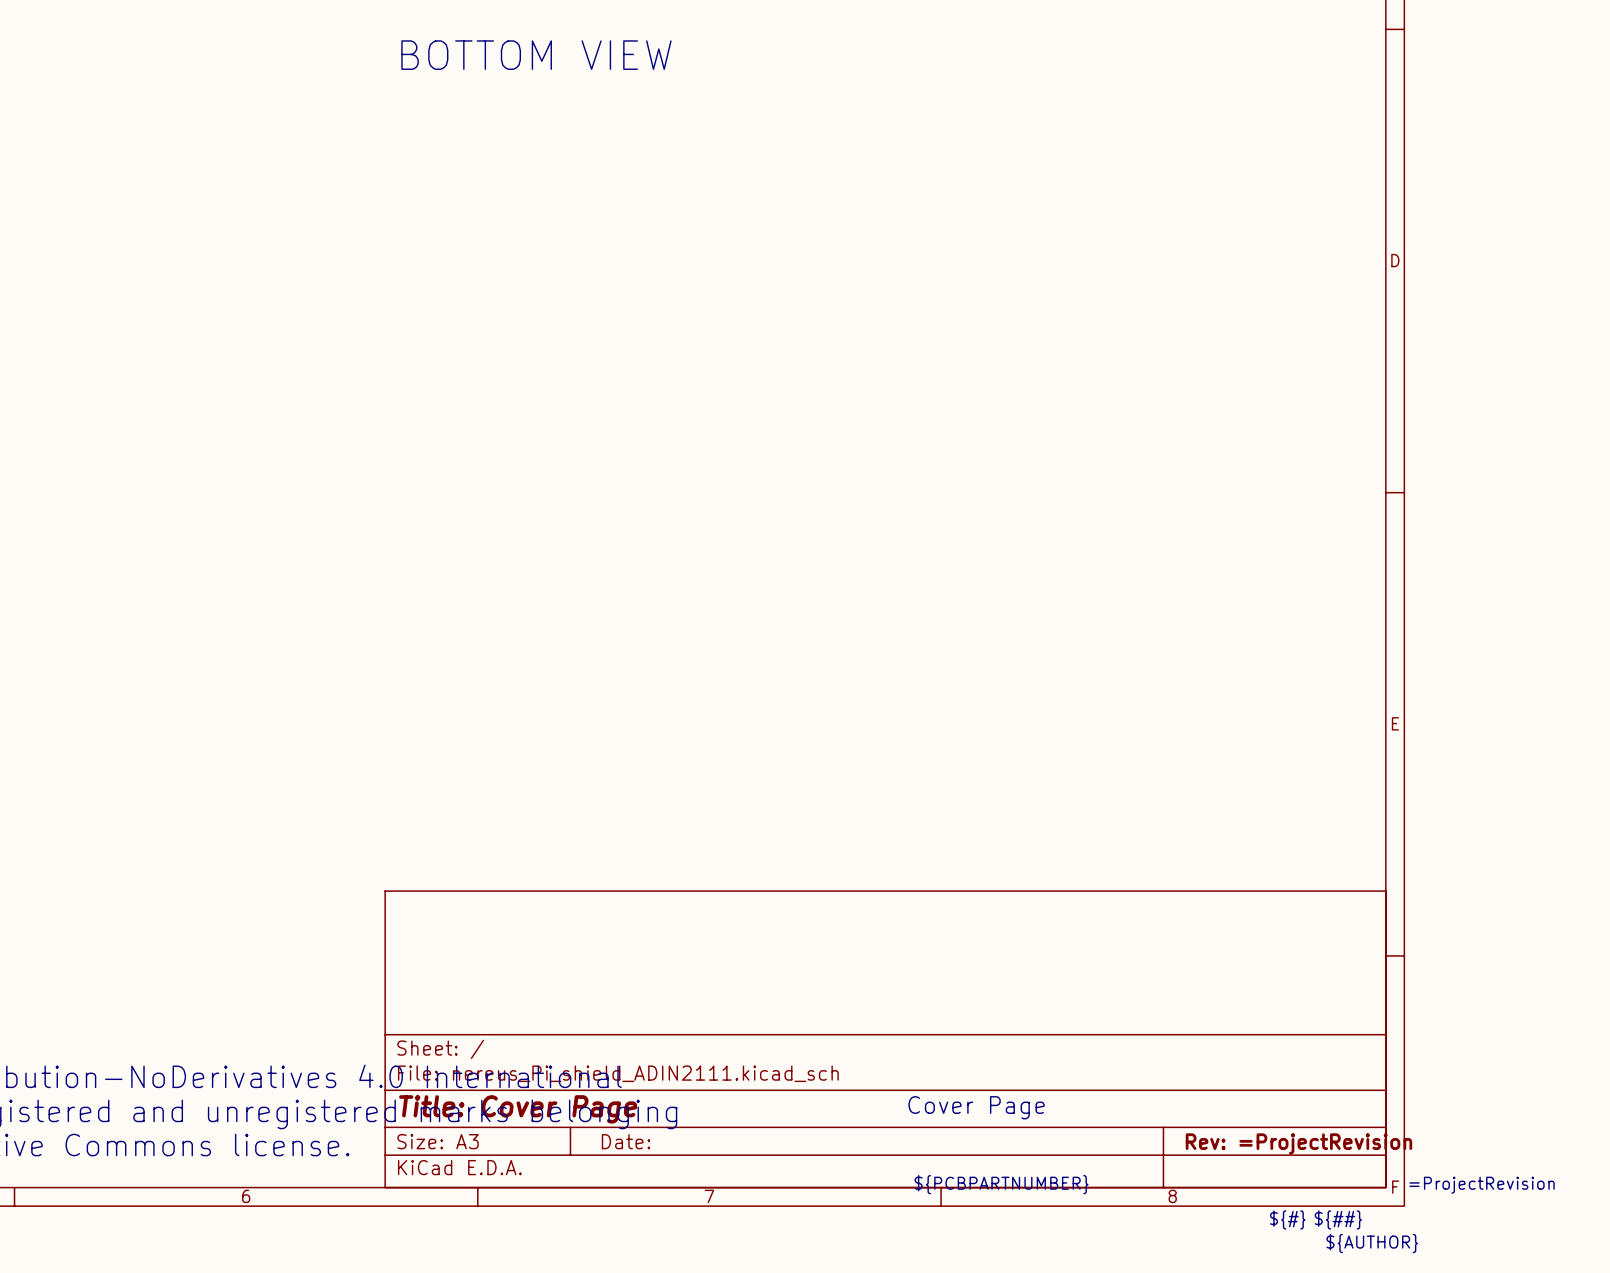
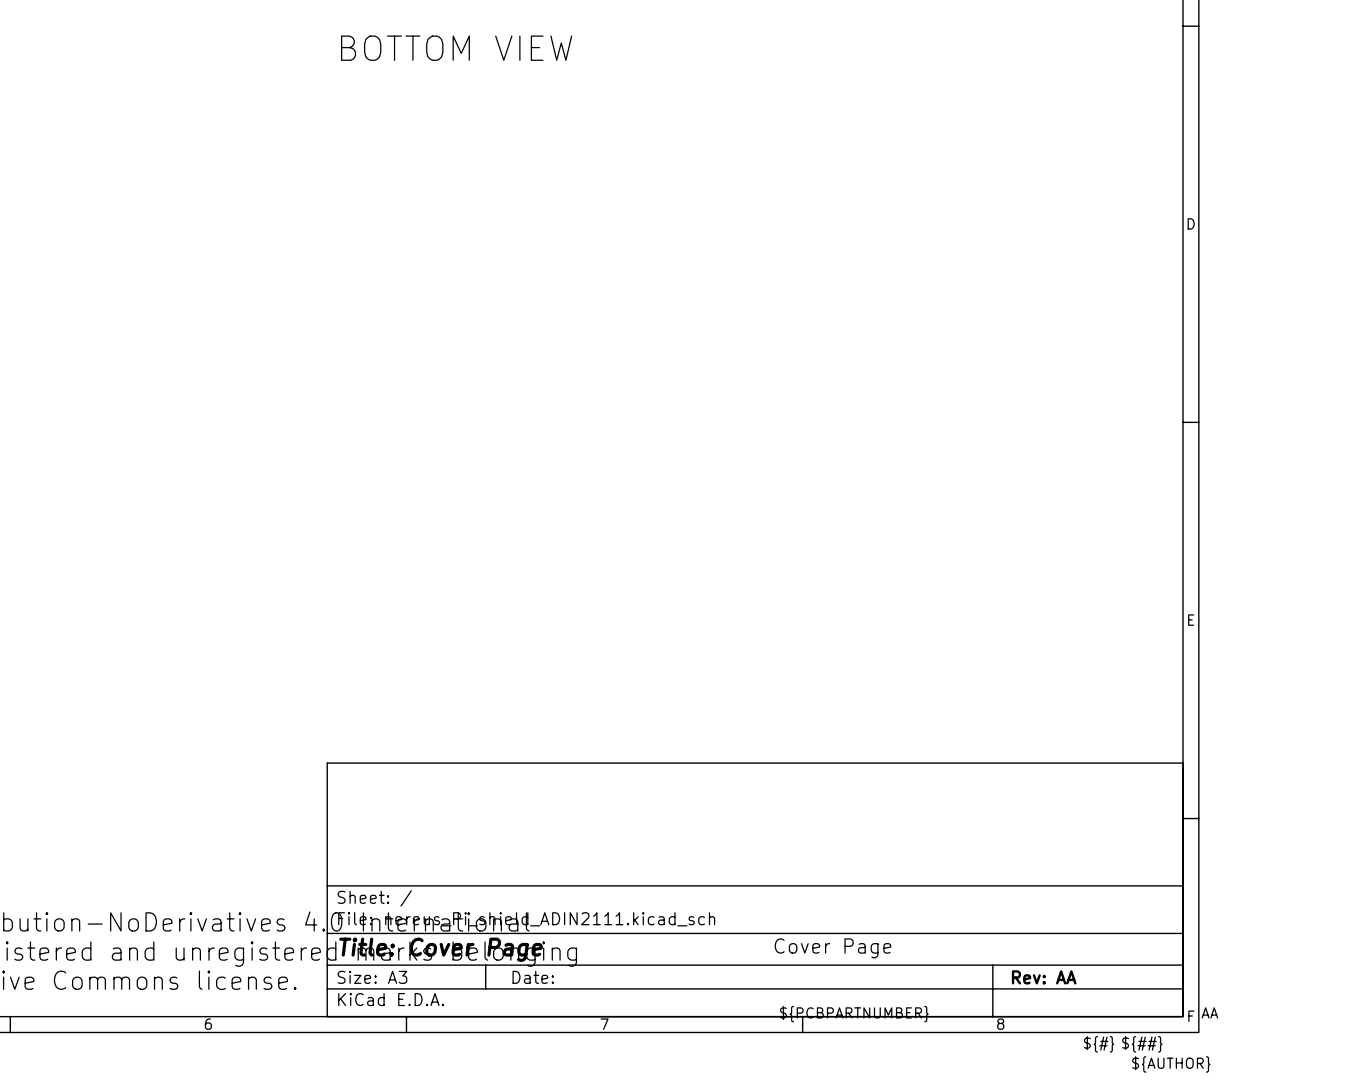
title block: Rev: =ProjectRevision (1298, 1143) -> Rev: AA (1044, 977)
text: =ProjectRevision (1482, 1185) -> AA (1209, 1012)

